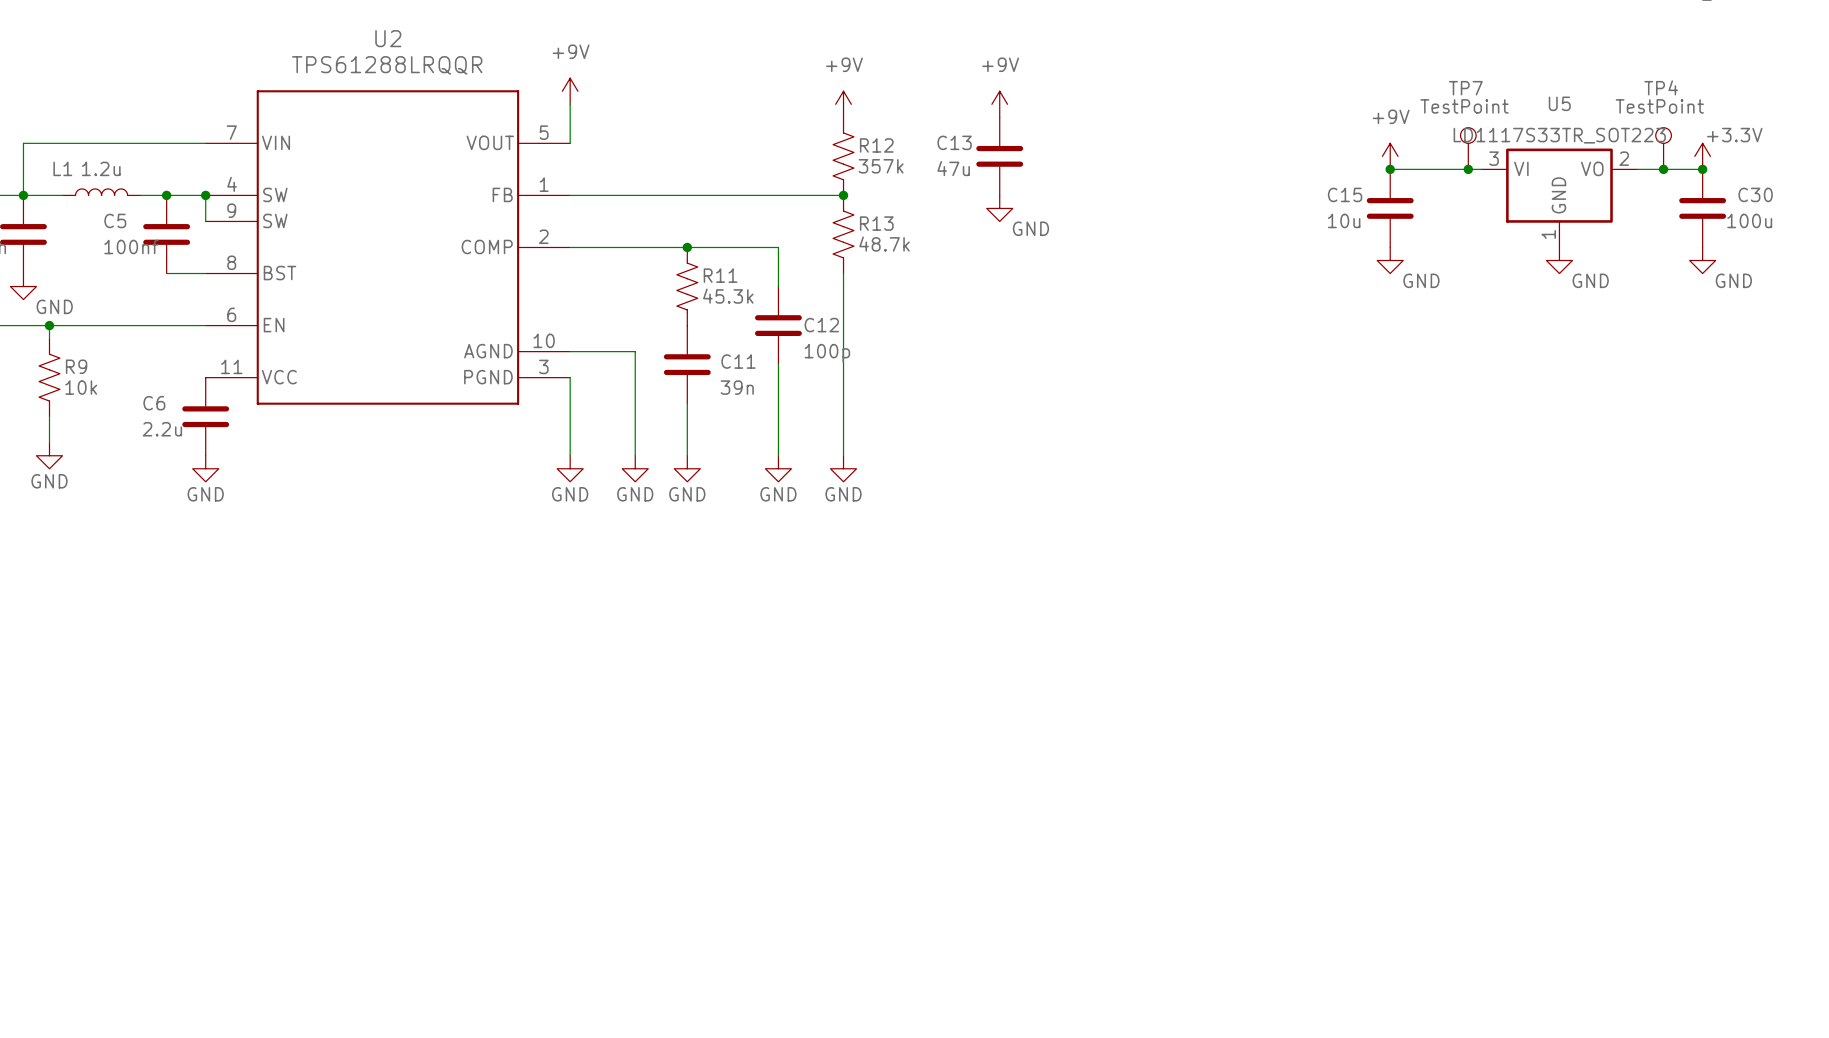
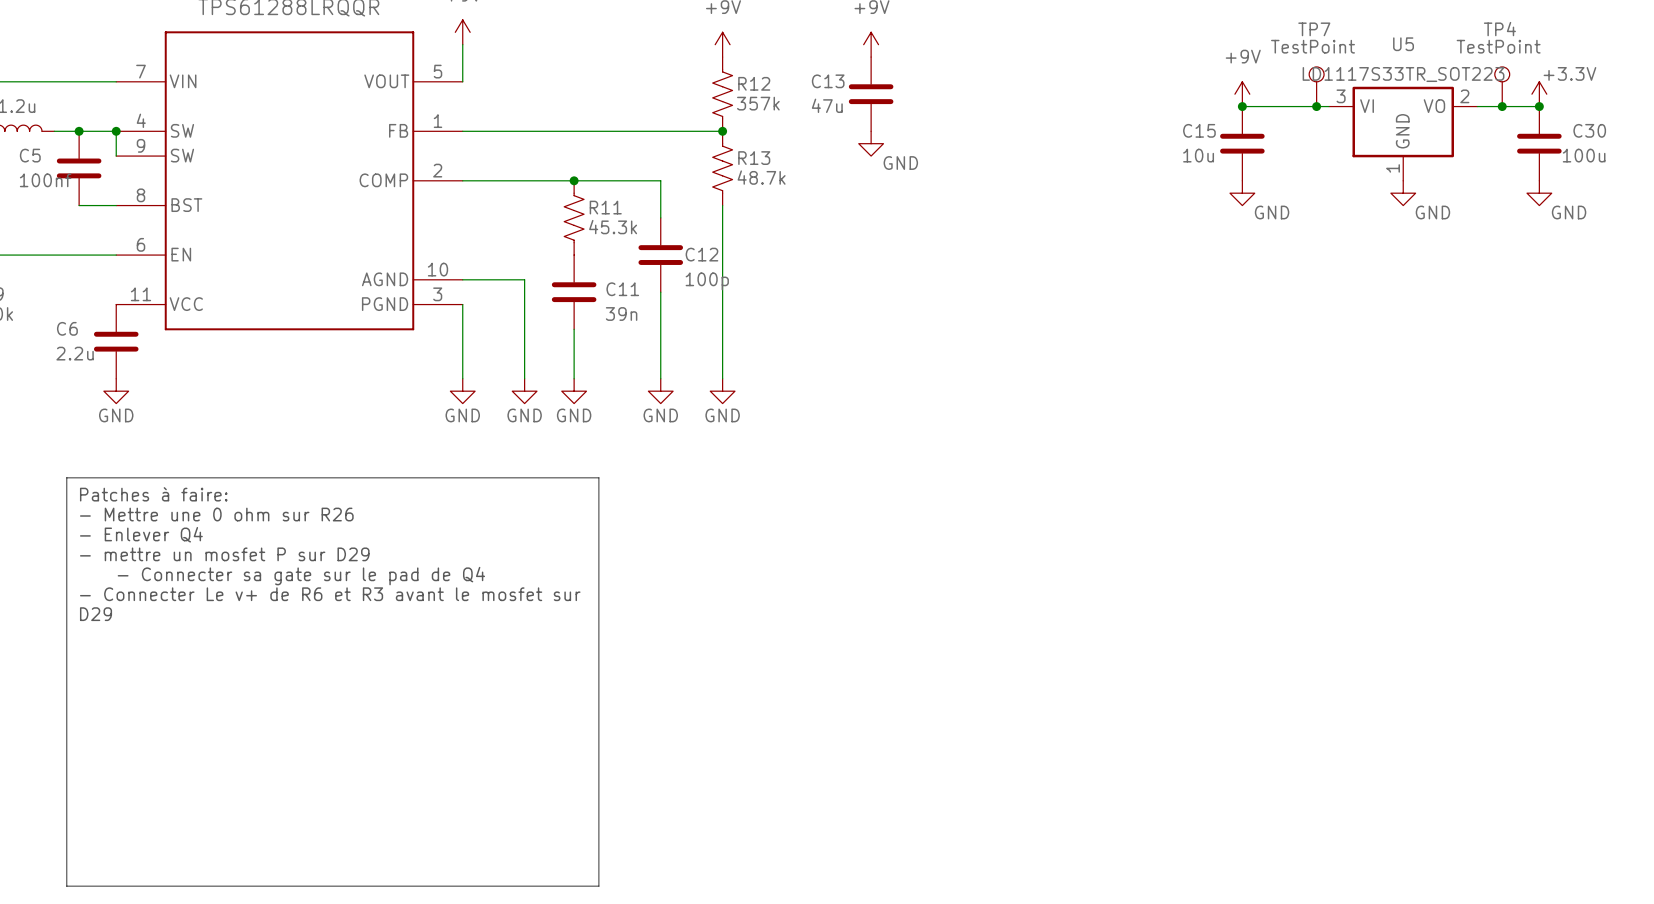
line: none -> (66, 477) (598, 477) (598, 886) (66, 886) (66, 477)
text: none -> Patches à faire: (153, 494)
text: none -> - Mettre une 0 ohm sur R26 (216, 514)
text: none -> - Enlever Q4 (141, 534)
text: none -> - mettre un mosfet P sur D29 (224, 554)
text: none -> - Connecter sa gate sur le pad de Q4 (301, 576)
text: none -> - Connecter Le v+ de R6 et R3 avant le mosfet sur (330, 594)
text: none -> D29 (96, 614)

